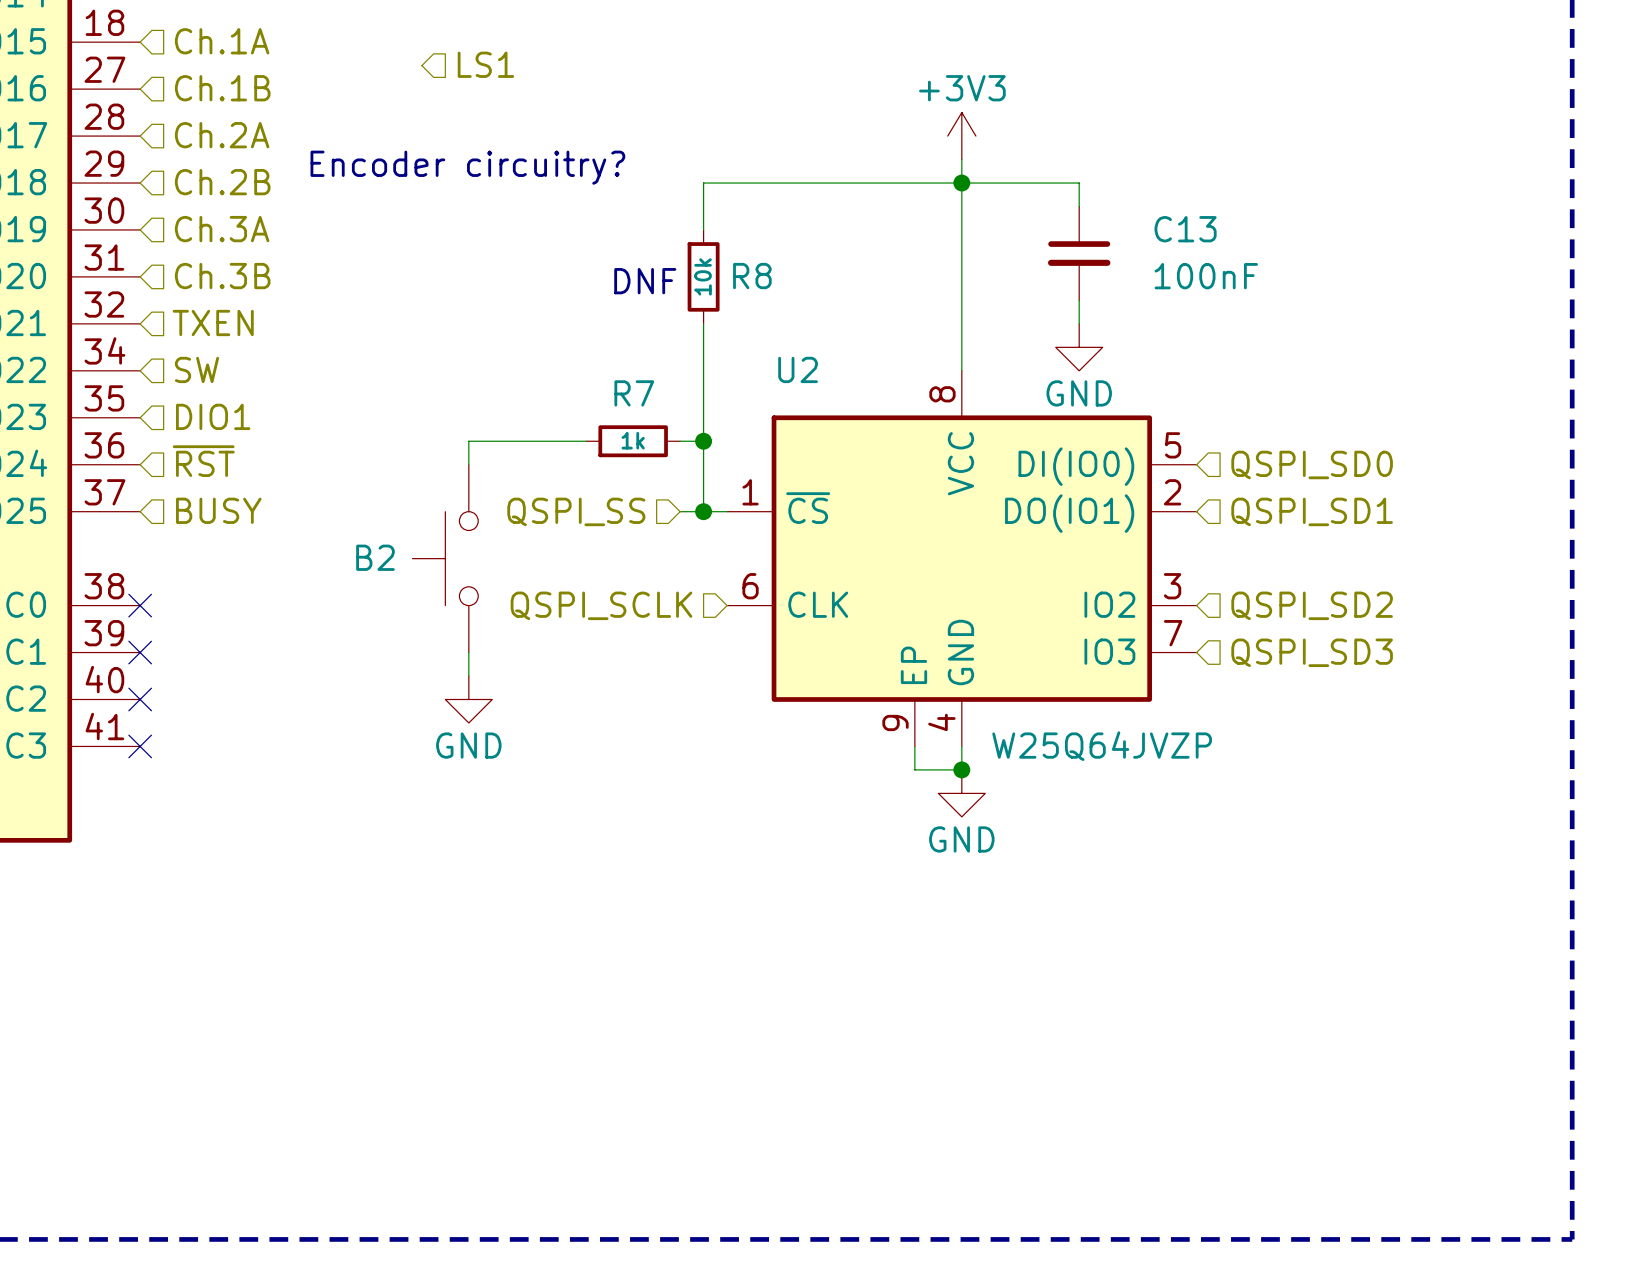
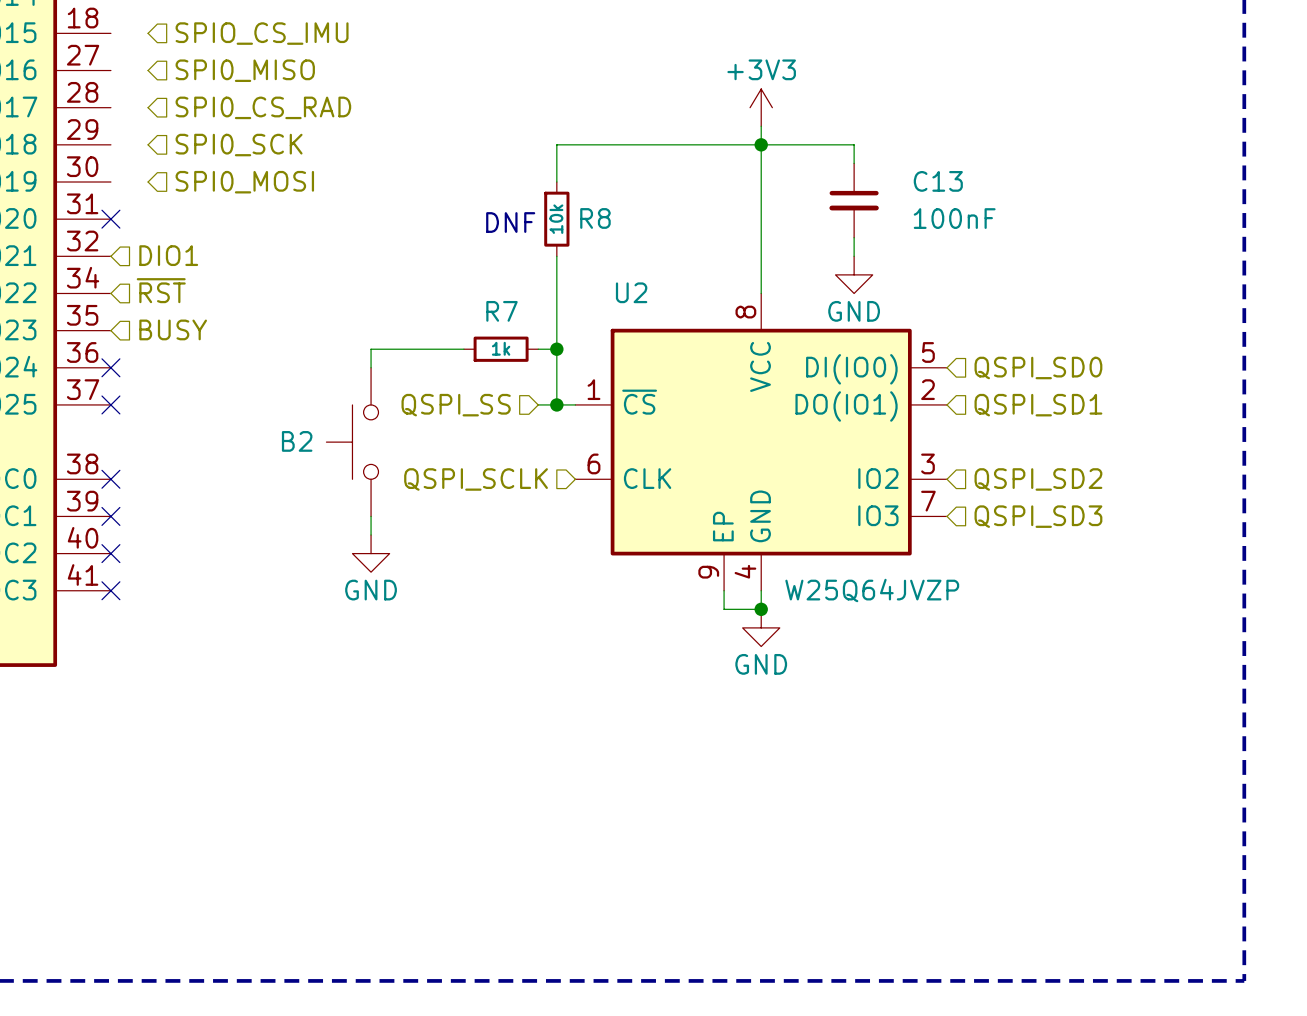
hierarchical label: Ch.1A (222, 41) -> none
hierarchical label: none -> SPIO_CS_IMU (262, 33)
hierarchical label: LS1 (485, 64) -> none
hierarchical label: Ch.1B (222, 88) -> none
hierarchical label: none -> SPI0_MISO (245, 70)
hierarchical label: Ch.2A (222, 135) -> none
hierarchical label: none -> SPI0_CS_RAD (263, 107)
text: Encoder circuitry? (467, 167) -> none
hierarchical label: Ch.2B (222, 182) -> none
hierarchical label: none -> SPI0_SCK (239, 145)
hierarchical label: Ch.3A (222, 229) -> none
hierarchical label: none -> SPI0_MOSI (244, 182)
no-connect mark: none -> (110, 219)
hierarchical label: Ch.3B (222, 276) -> none
hierarchical label: TXEN (213, 322) -> DIO1 (168, 255)
hierarchical label: SW (196, 369) -> ~{RST} (161, 290)
hierarchical label: DIO1 (213, 416) -> BUSY (173, 329)
hierarchical label: ~{RST} (203, 461) -> none
no-connect mark: none -> (110, 367)
hierarchical label: BUSY (218, 510) -> none
no-connect mark: none -> (110, 404)

